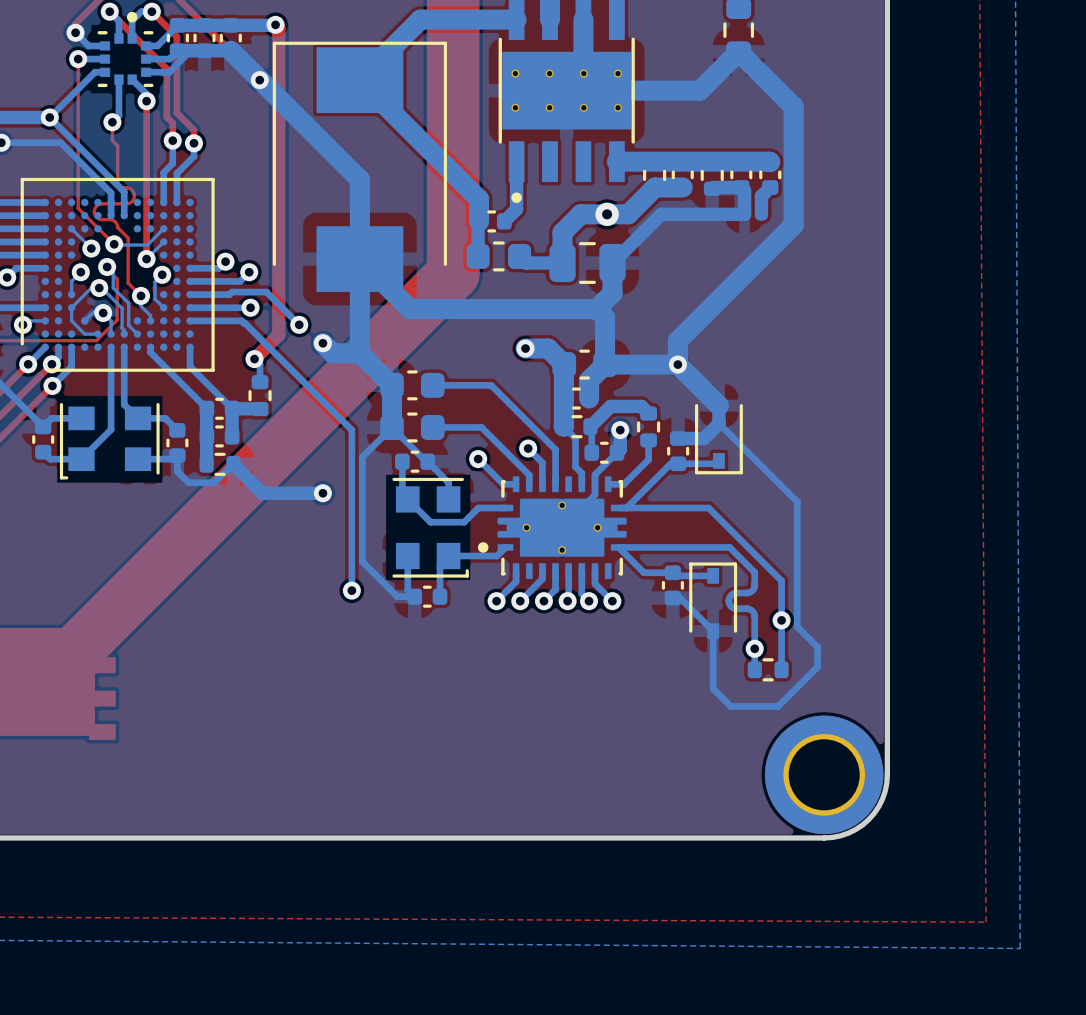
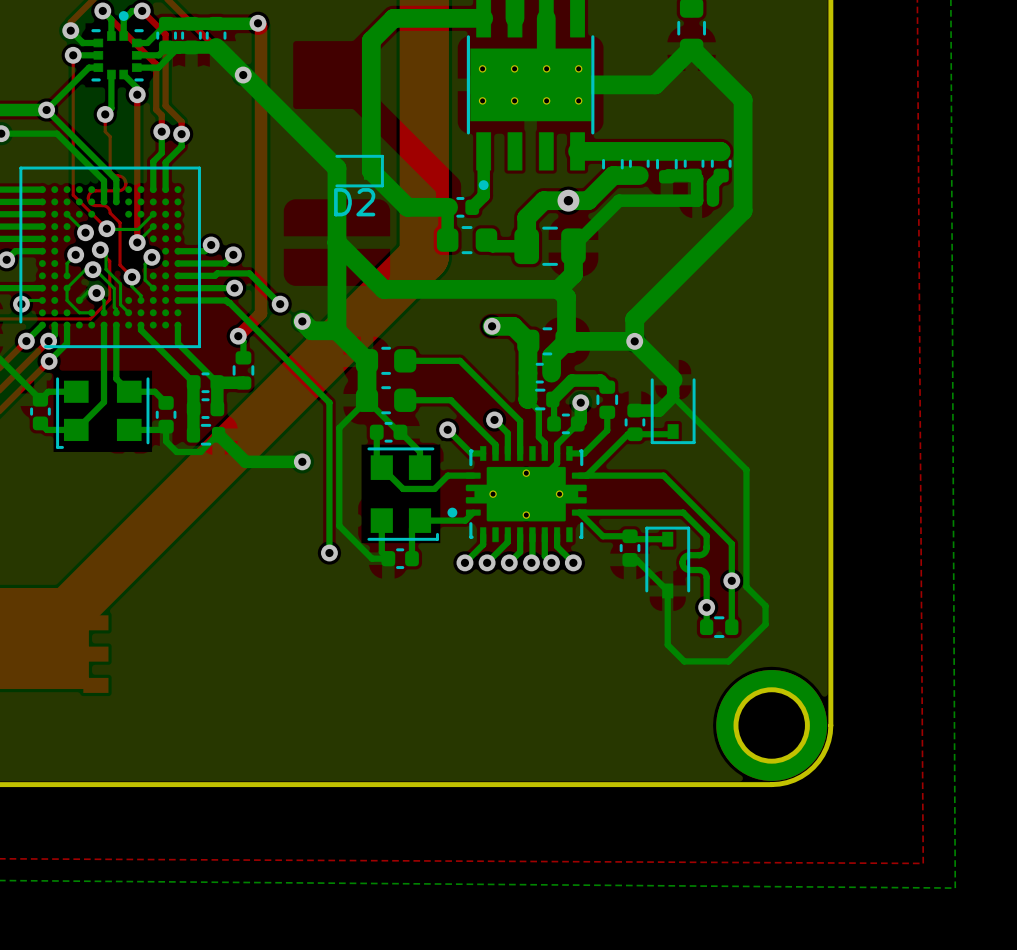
bottom track: (396, 43) (359, 80) (479, 199) (479, 221) -> (371, 40) (371, 171) (407, 207) (448, 207)
part: (359, 166) -> none
D2: none -> (356, 171)

